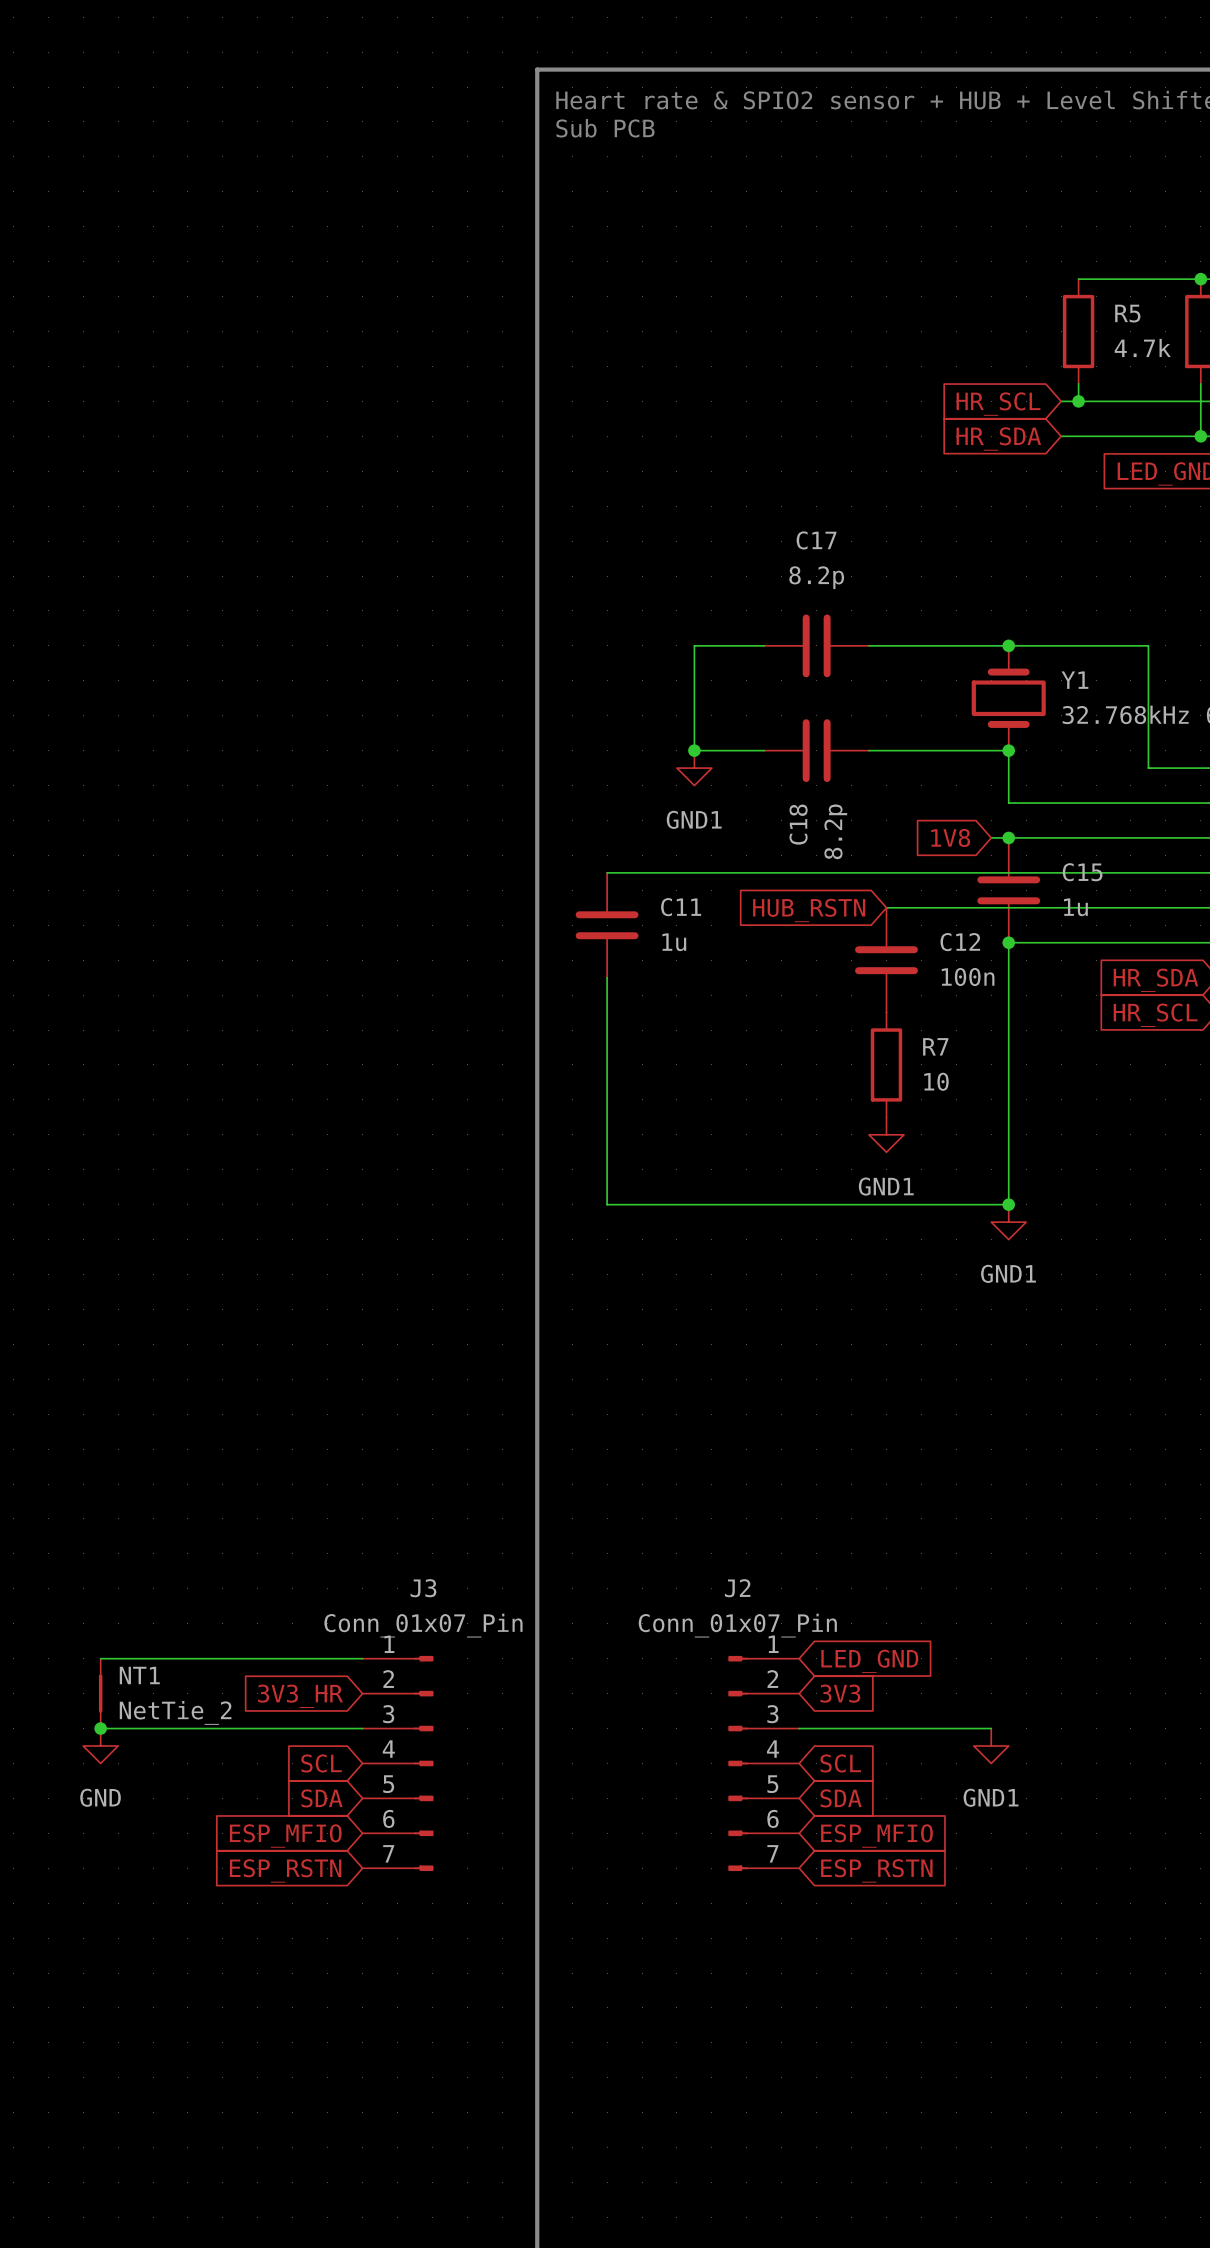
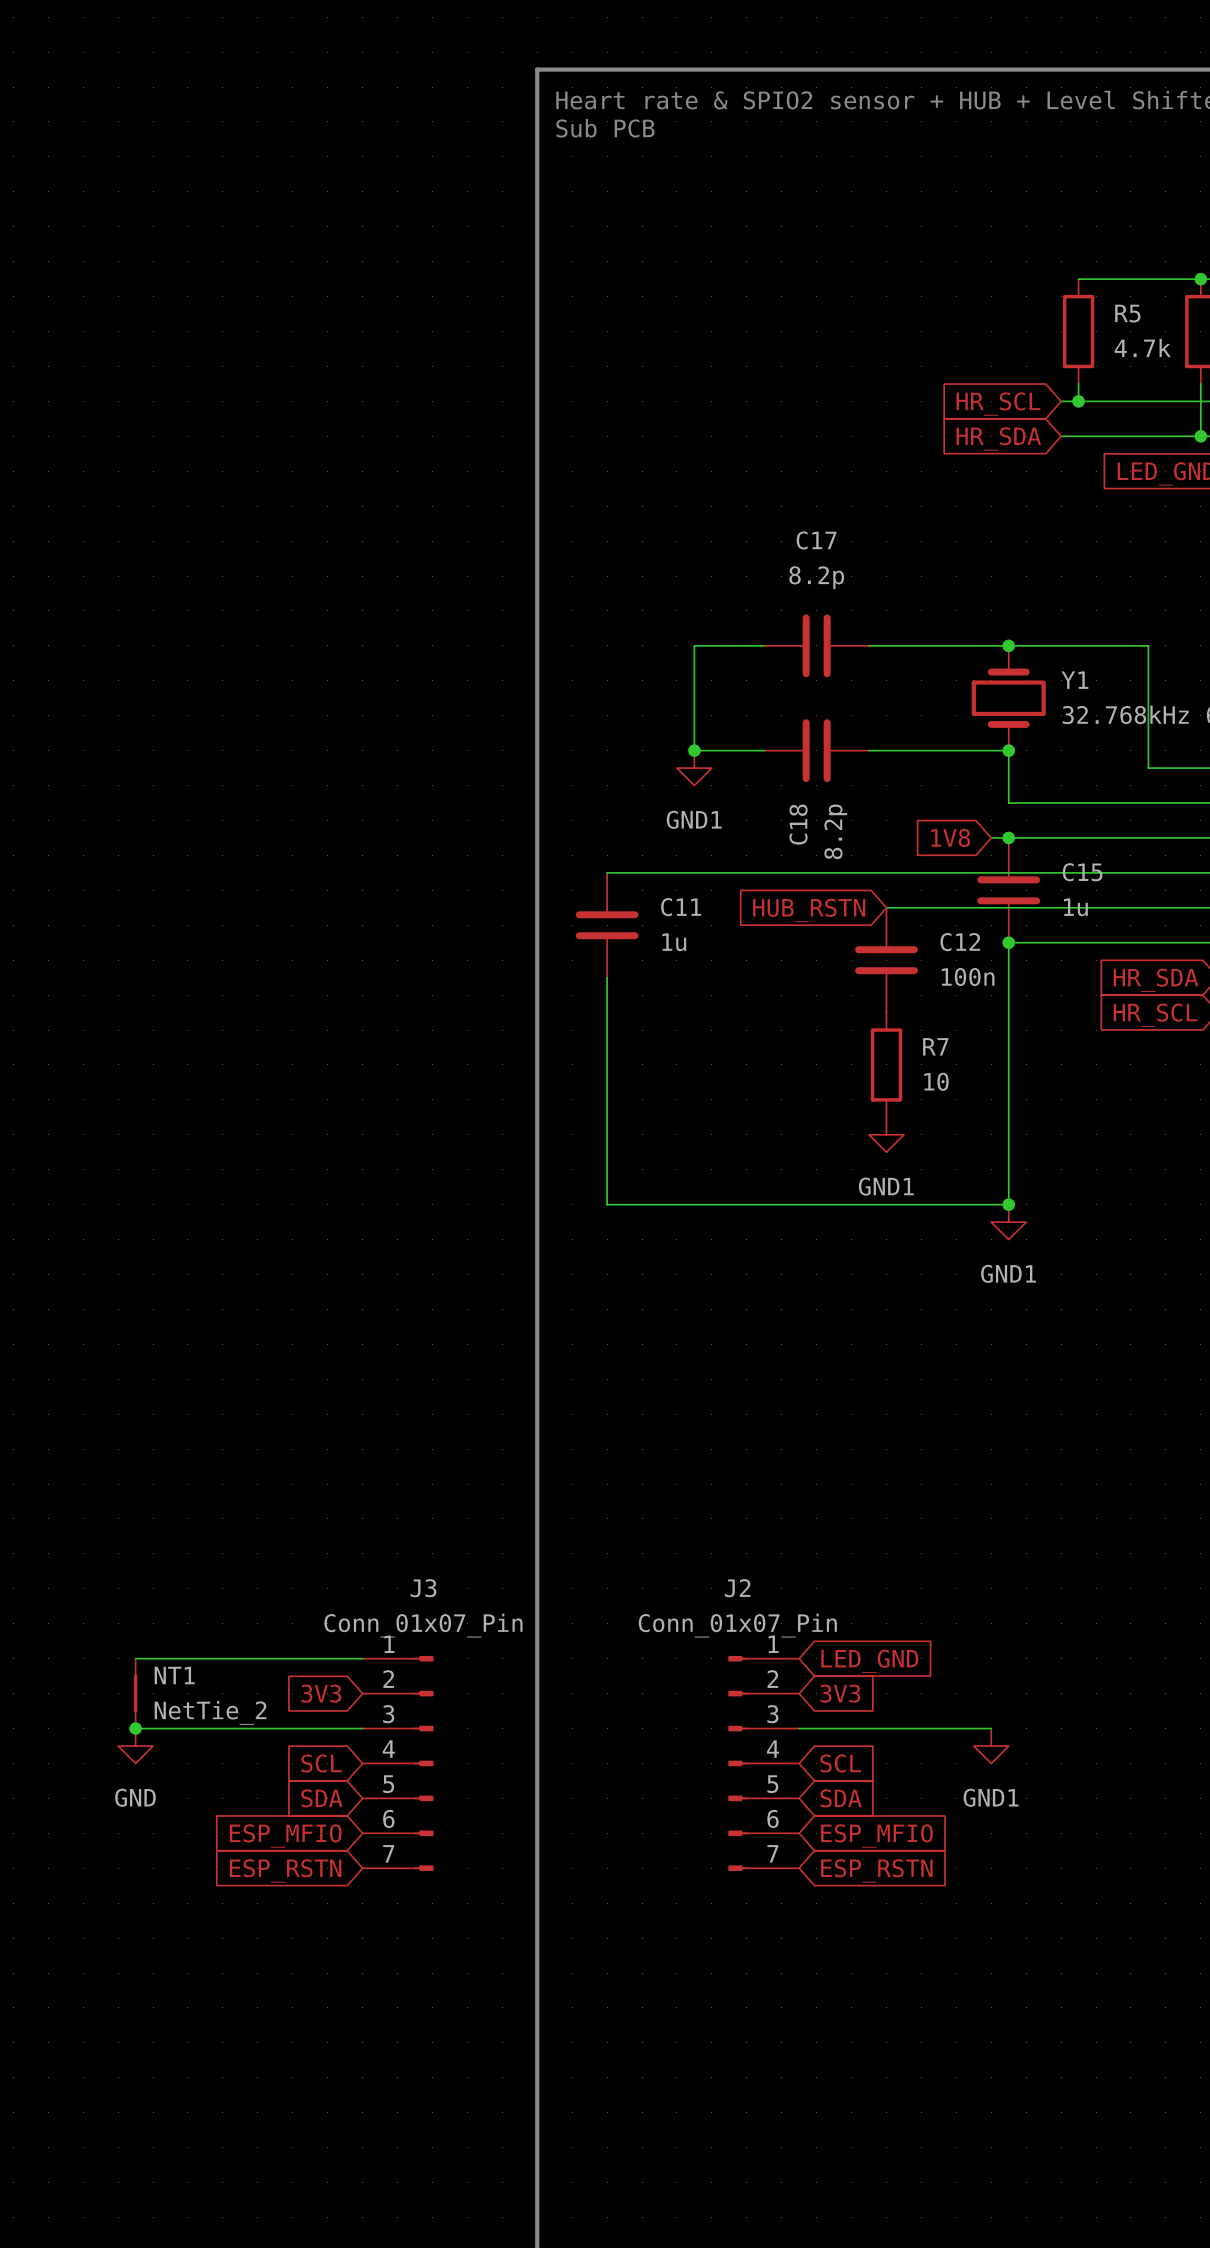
wire: (100, 1658) (135, 1658) -> none
NT1 position: (100, 1693) -> (135, 1693)
global label: 3V3_HR (300, 1696) -> 3V3 (321, 1693)
wire: (100, 1728) (135, 1728) -> none
junction position: (100, 1728) -> (135, 1728)
power symbol position: GND (100, 1746) -> GND (135, 1746)

